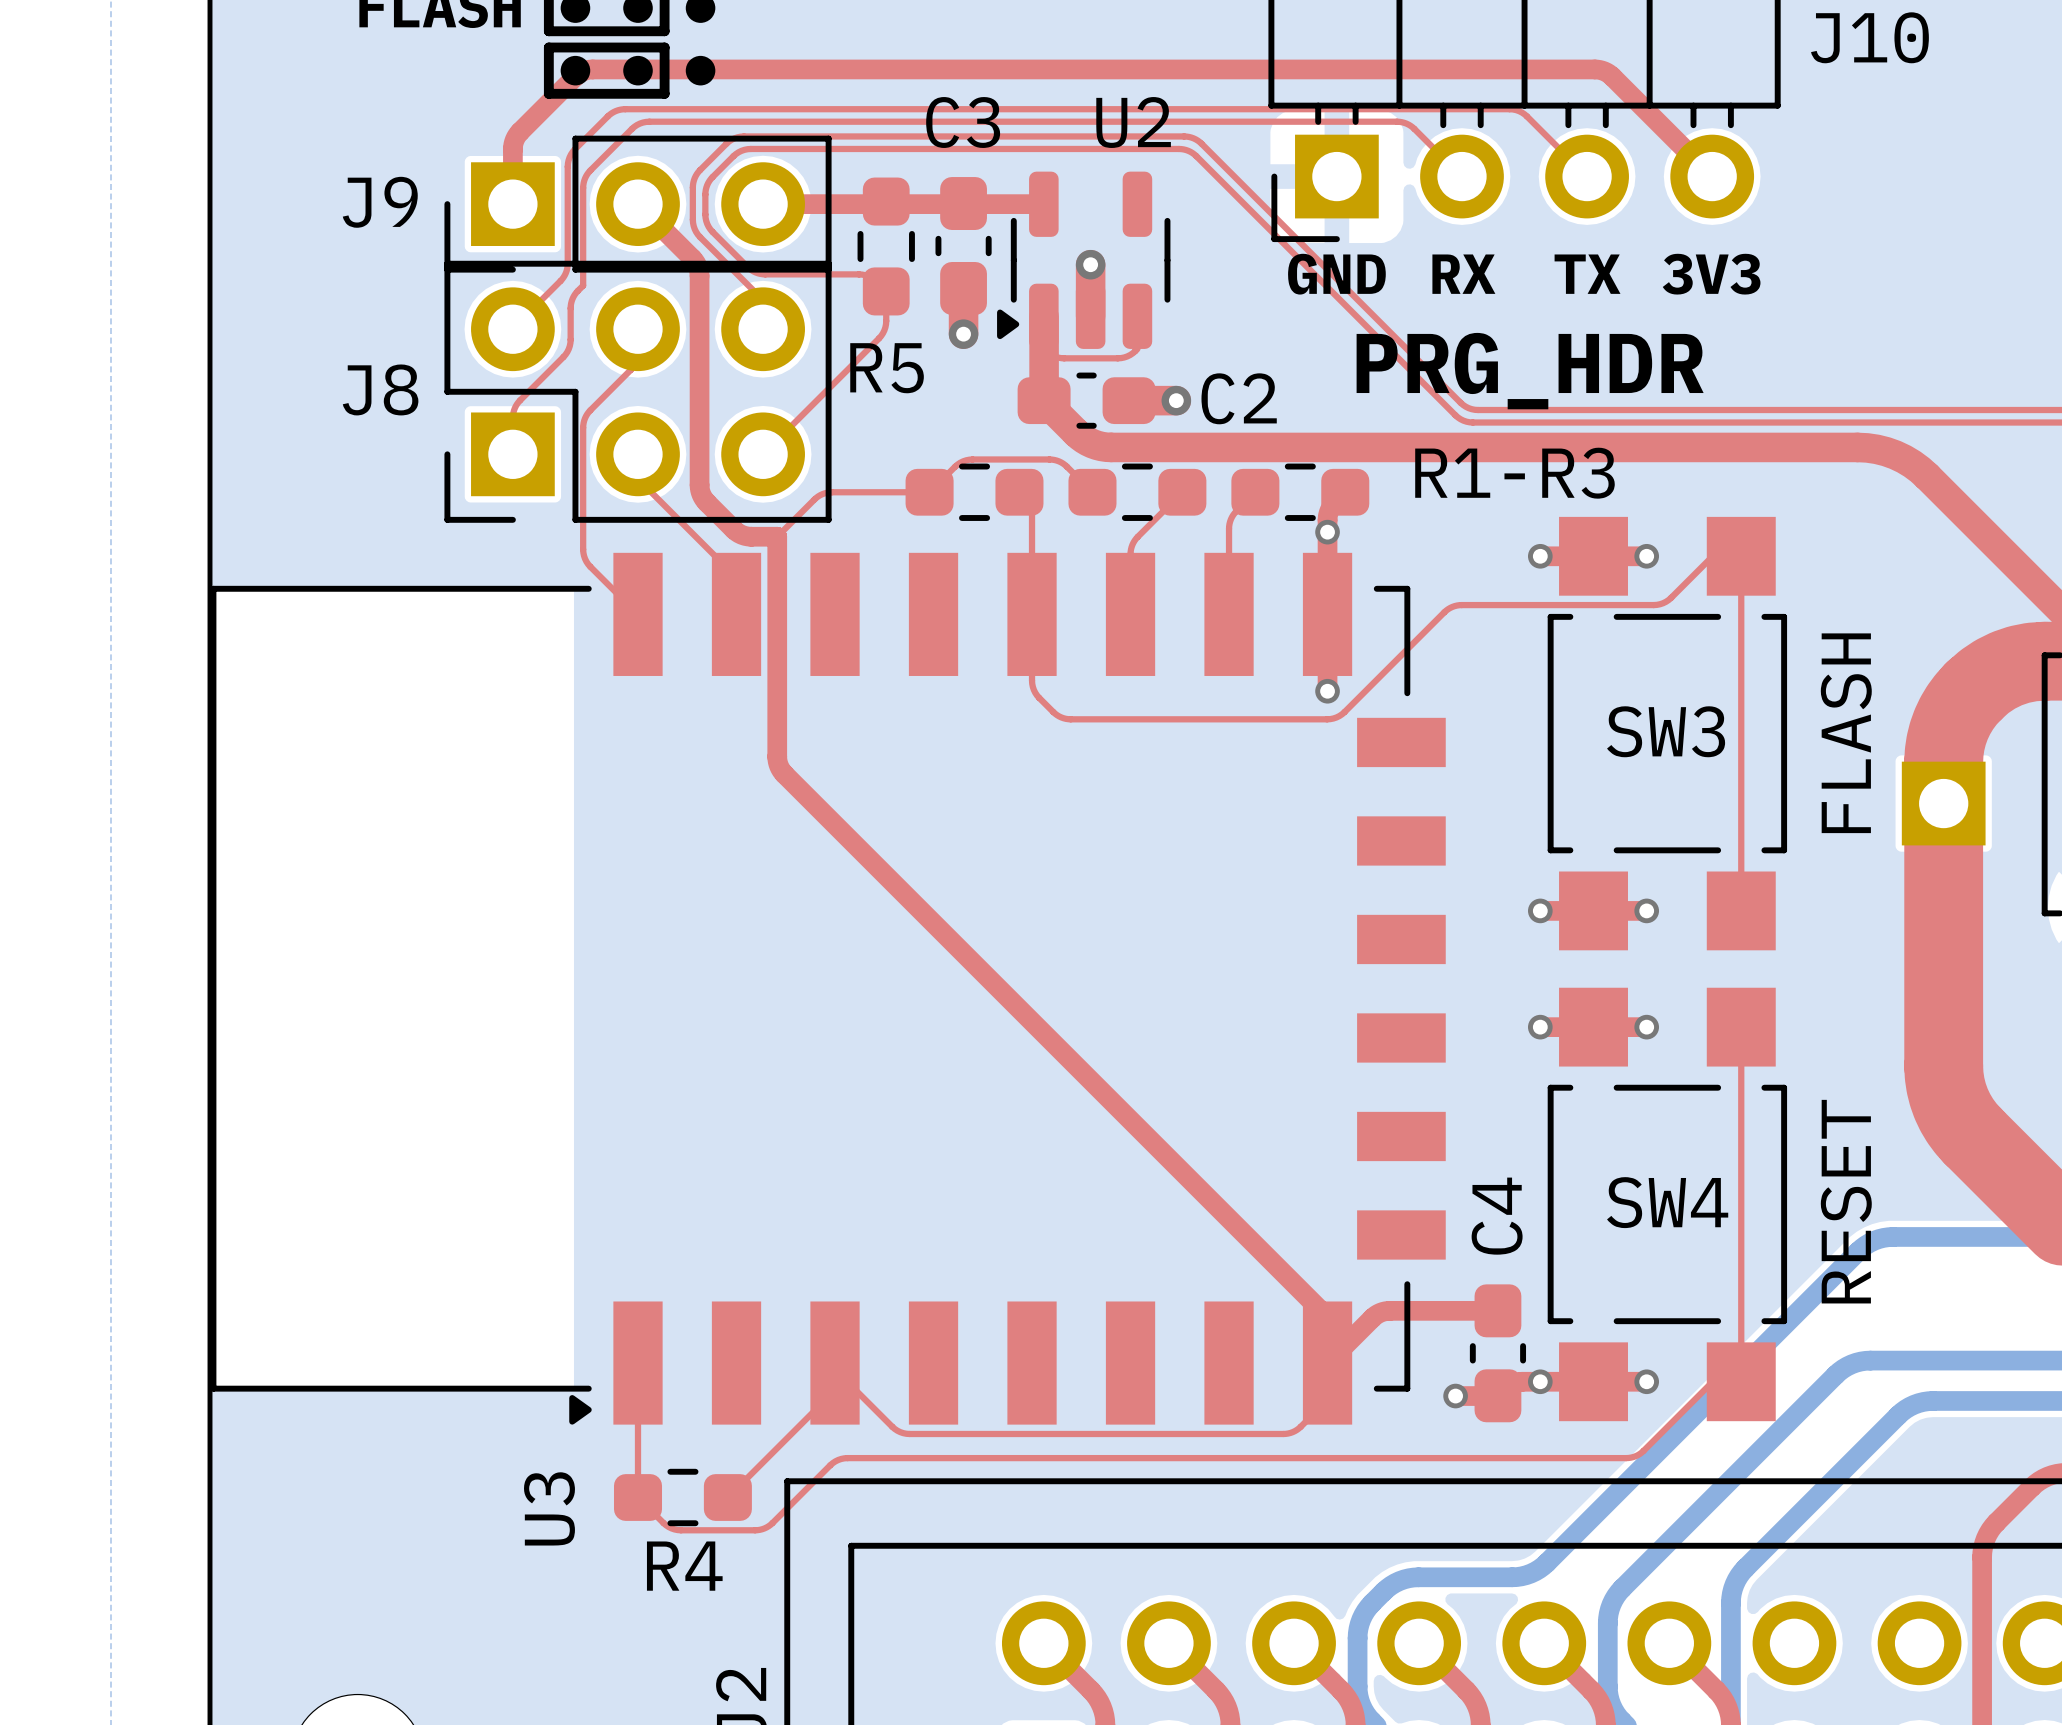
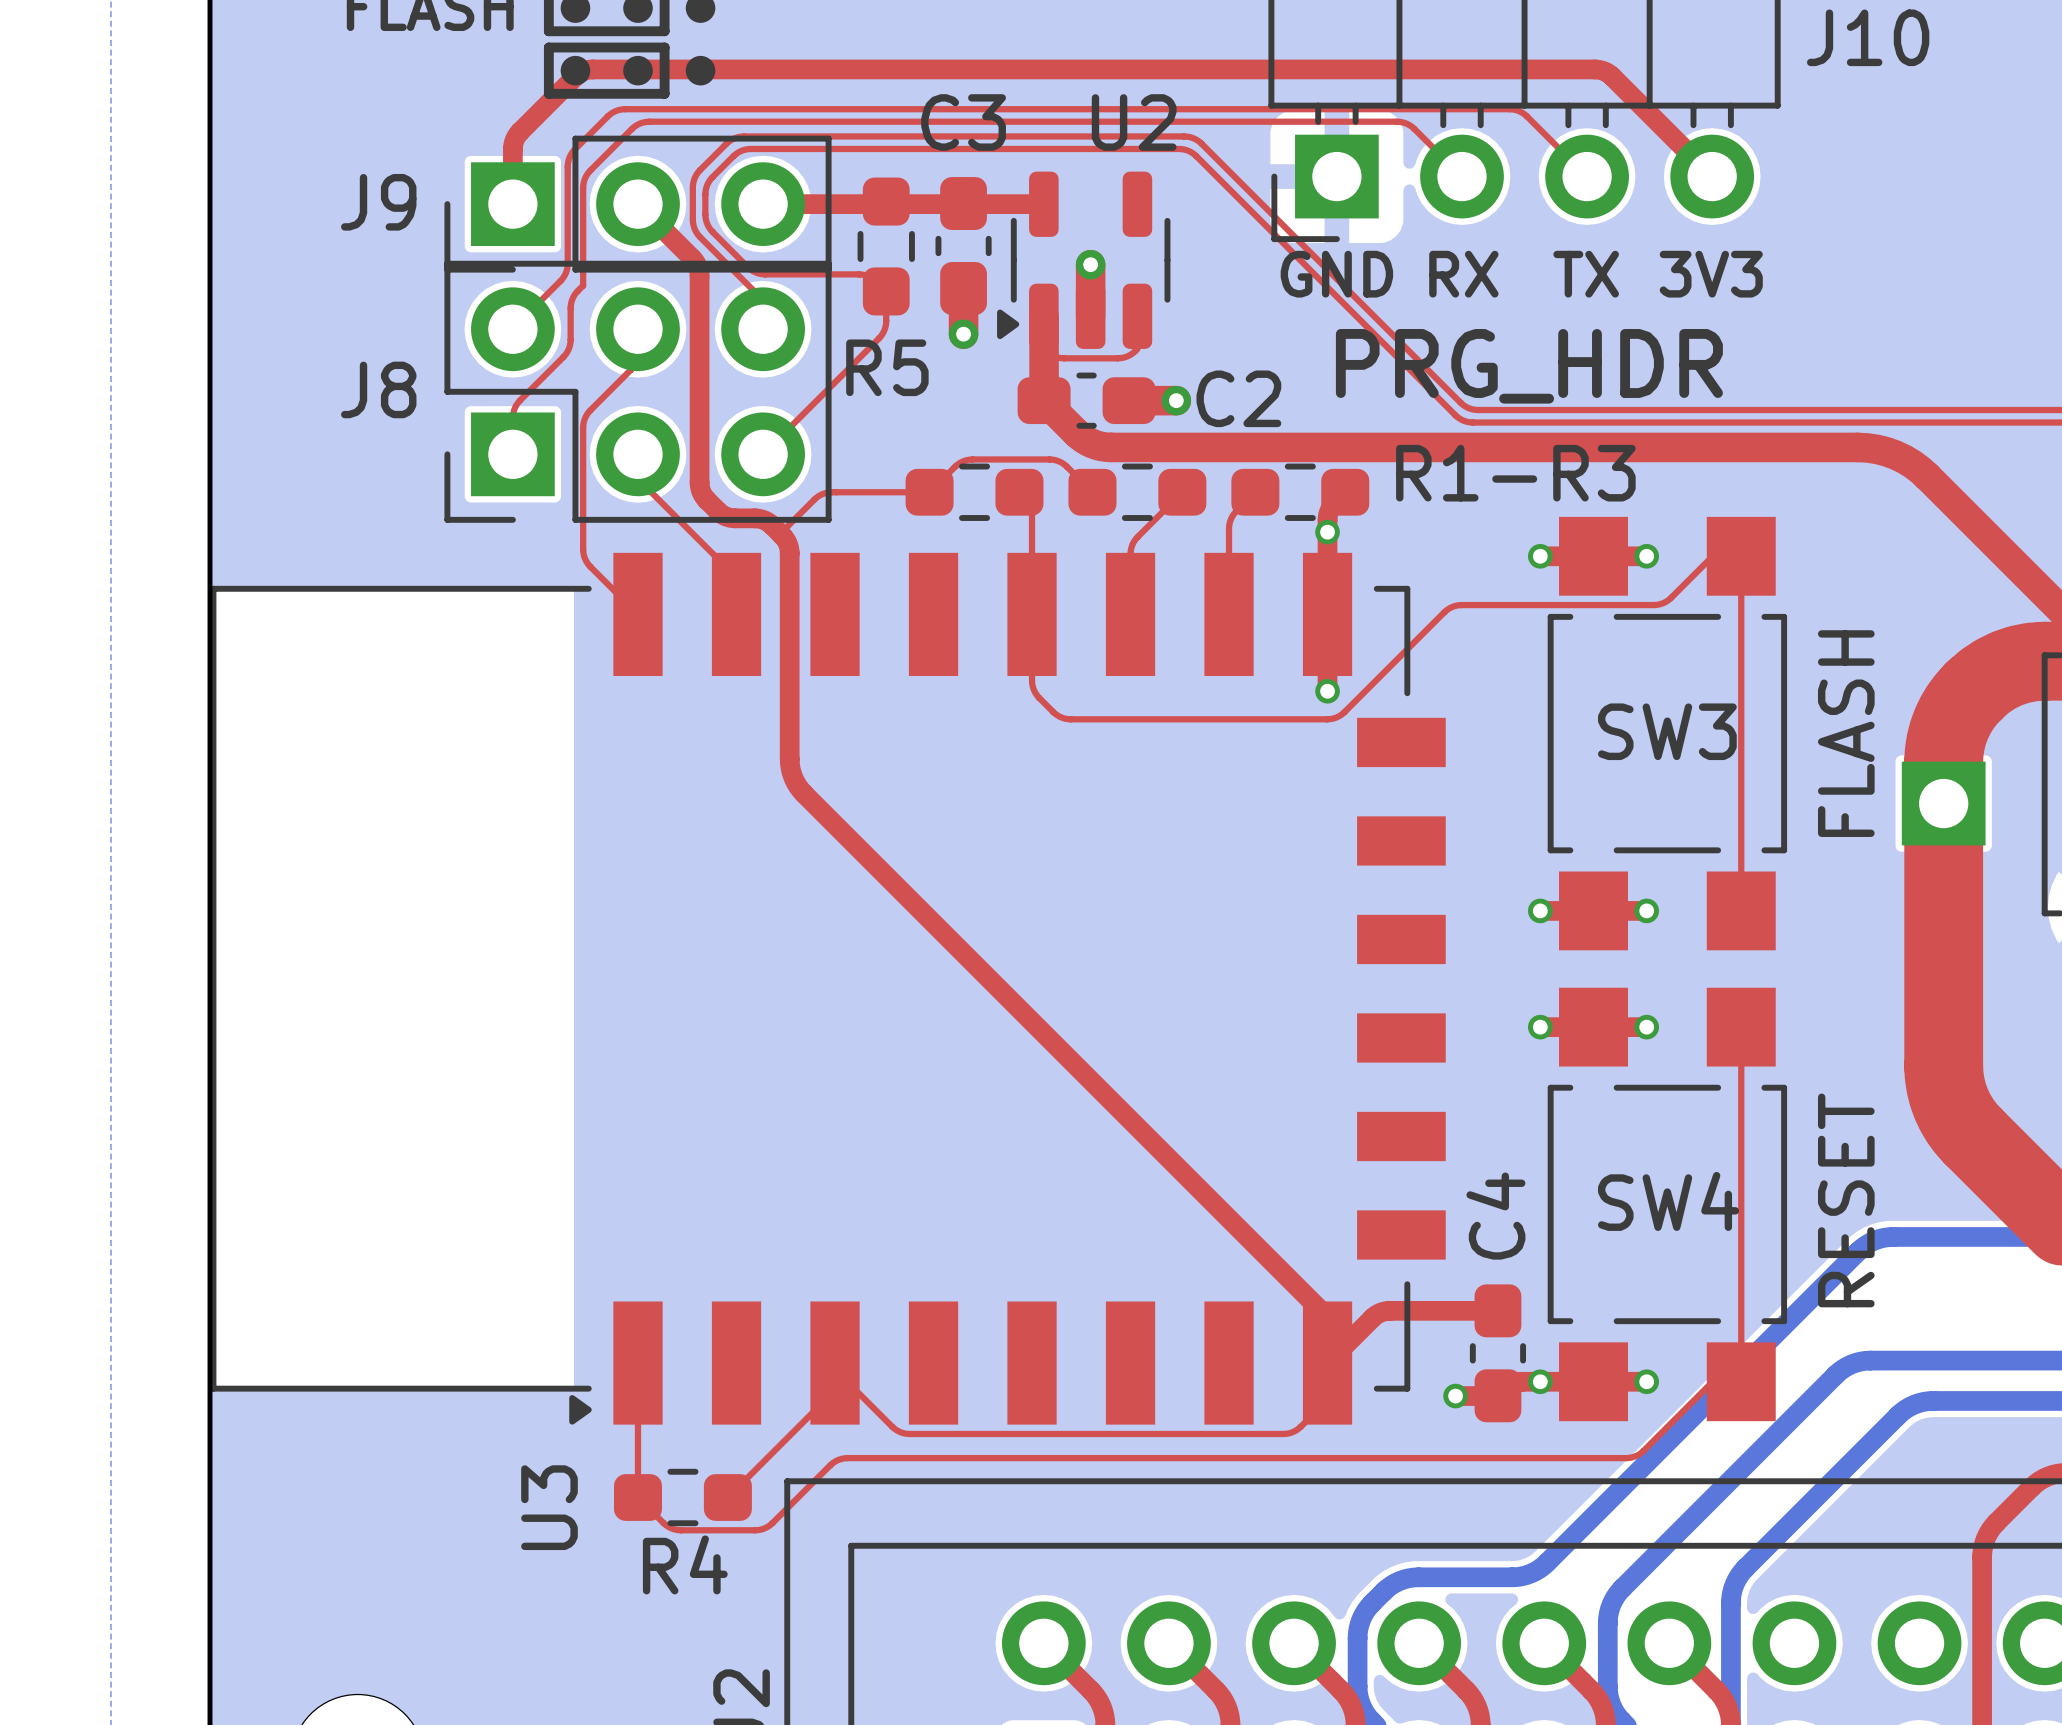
top track: (699, 482) (700, 492) (705, 500) (736, 531) (748, 536) (777, 536) (777, 759) (782, 772) (804, 793) -> (699, 482) (704, 497) (721, 514) (732, 518) (764, 520) (782, 535) (788, 546) (789, 763) (795, 782) (804, 793)

